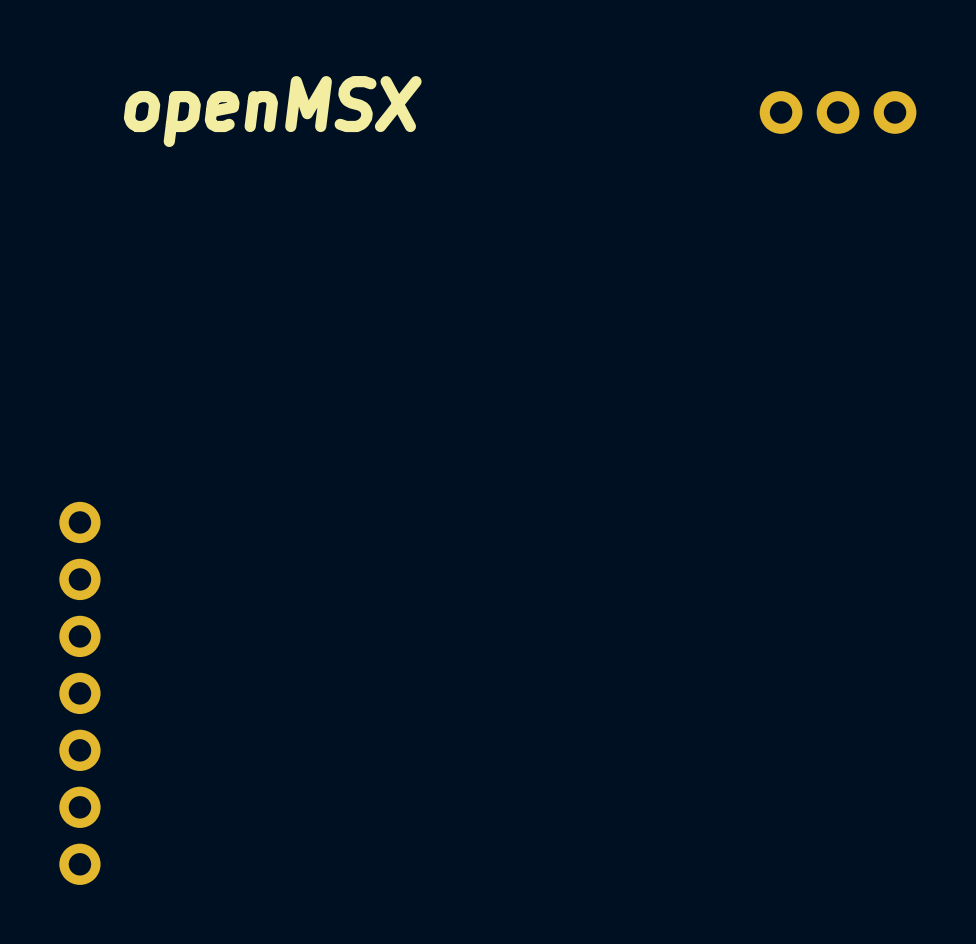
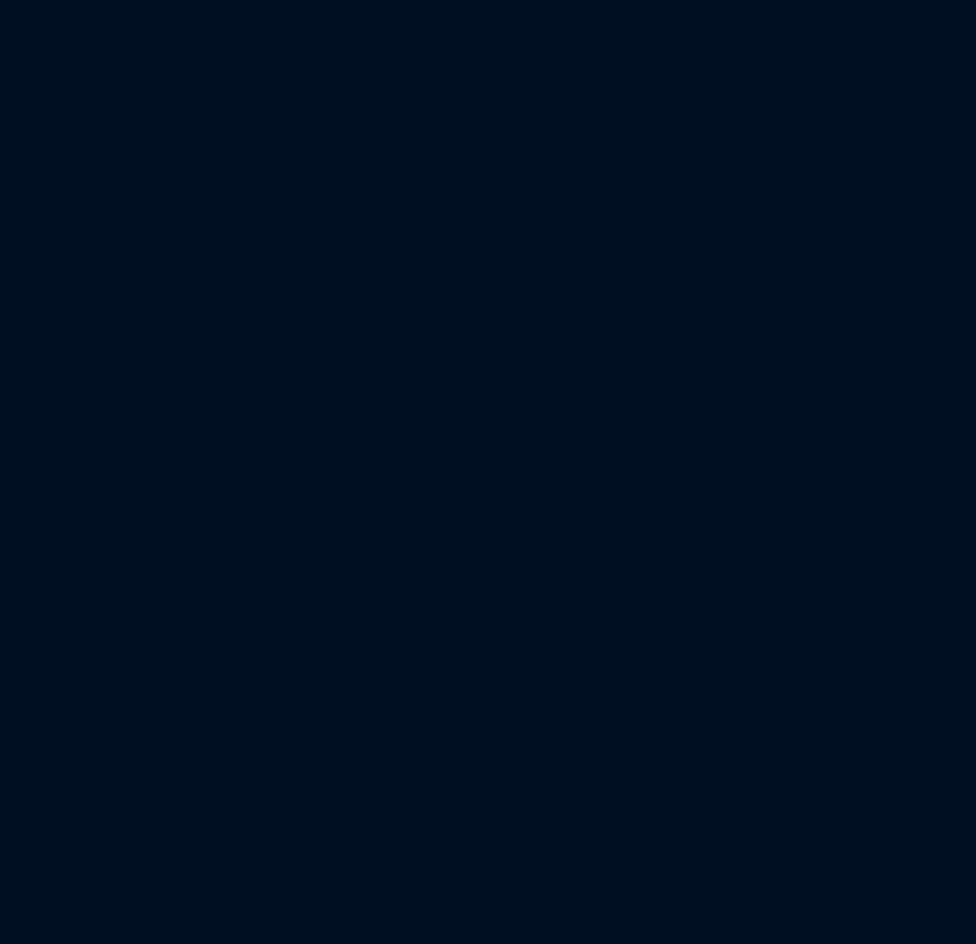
text: openMSX (272, 111) -> none
part: (838, 112) -> none
part: (79, 693) -> none

